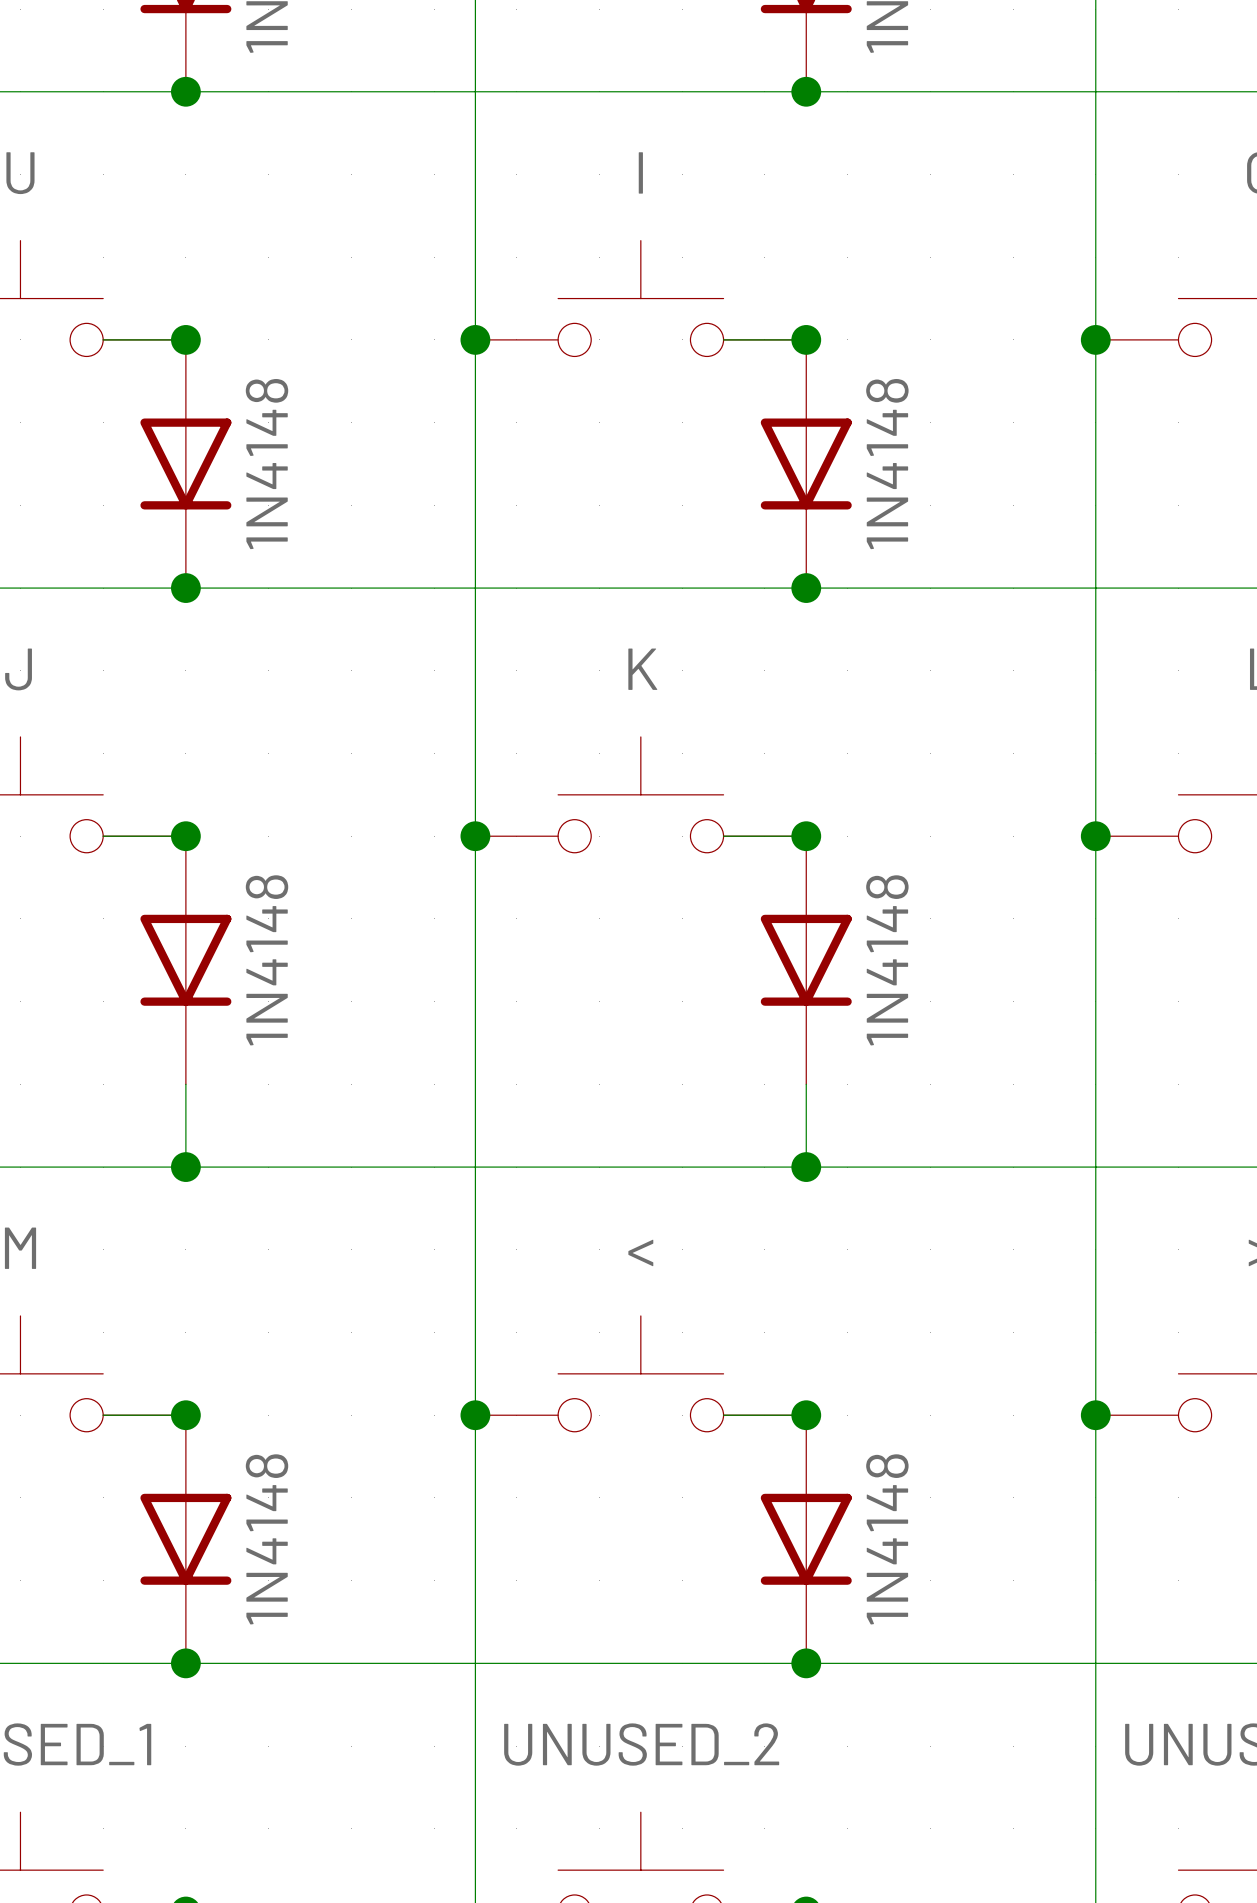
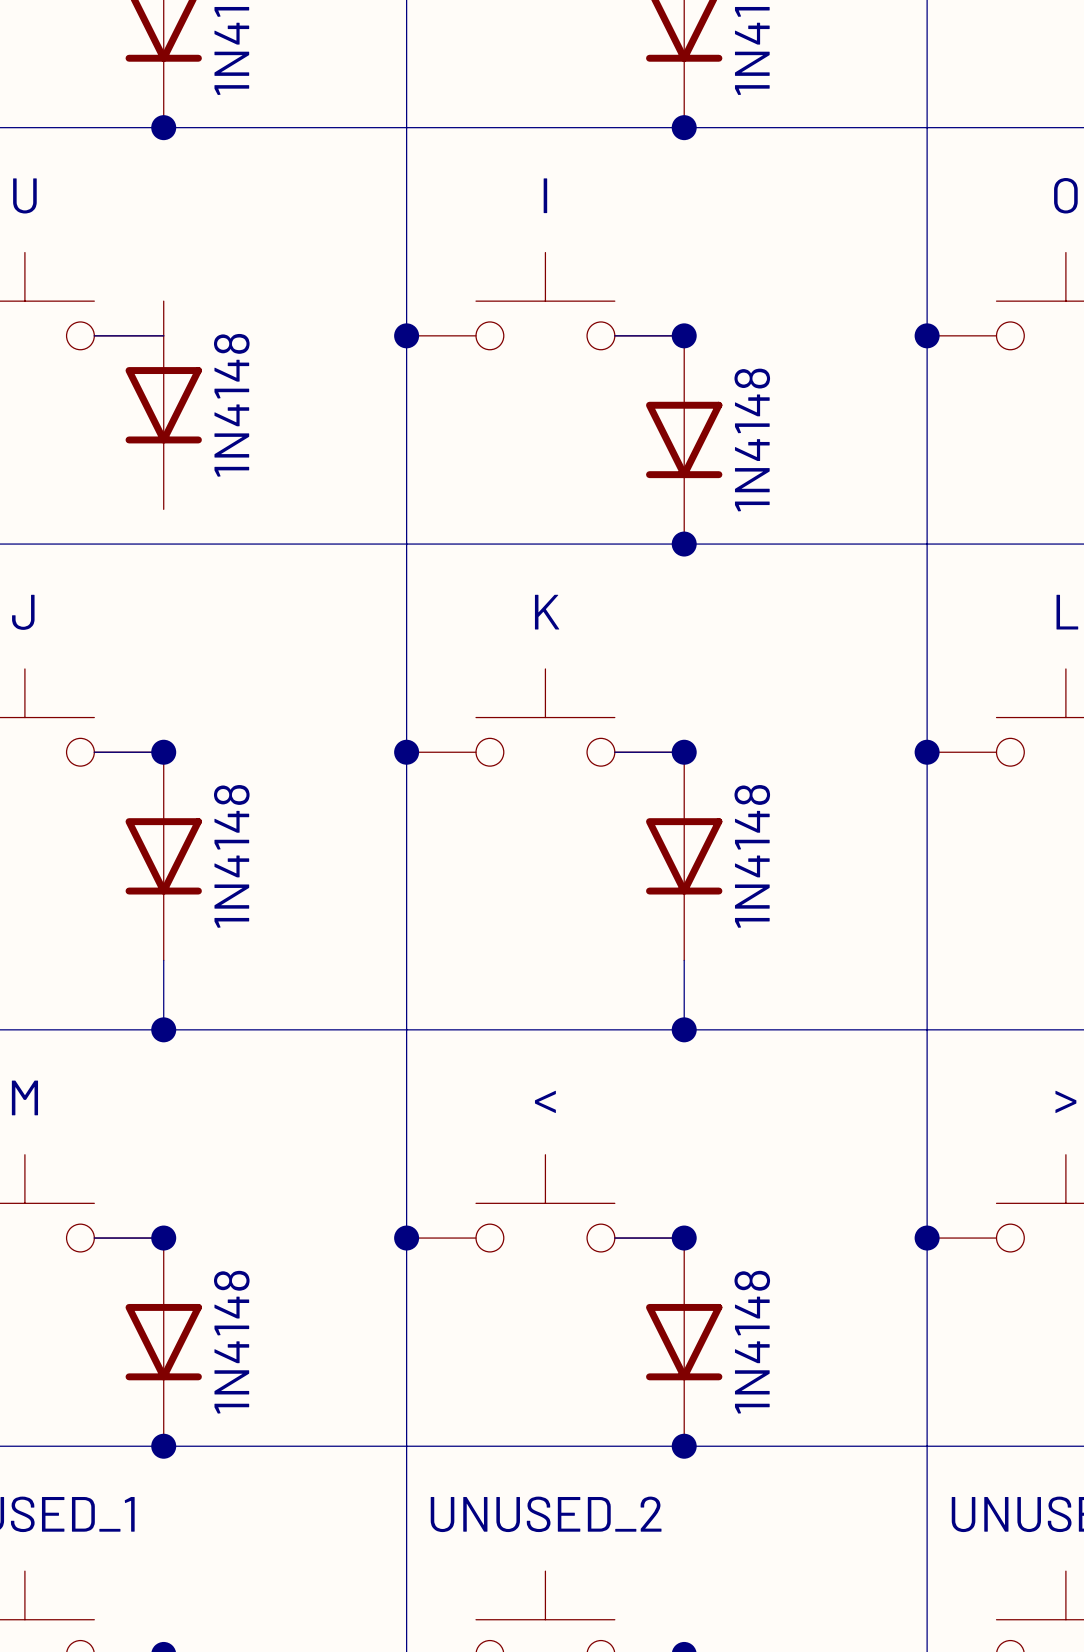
junction: (185, 339) -> none
part position: (185, 463) -> (163, 405)
junction: (185, 588) -> none

